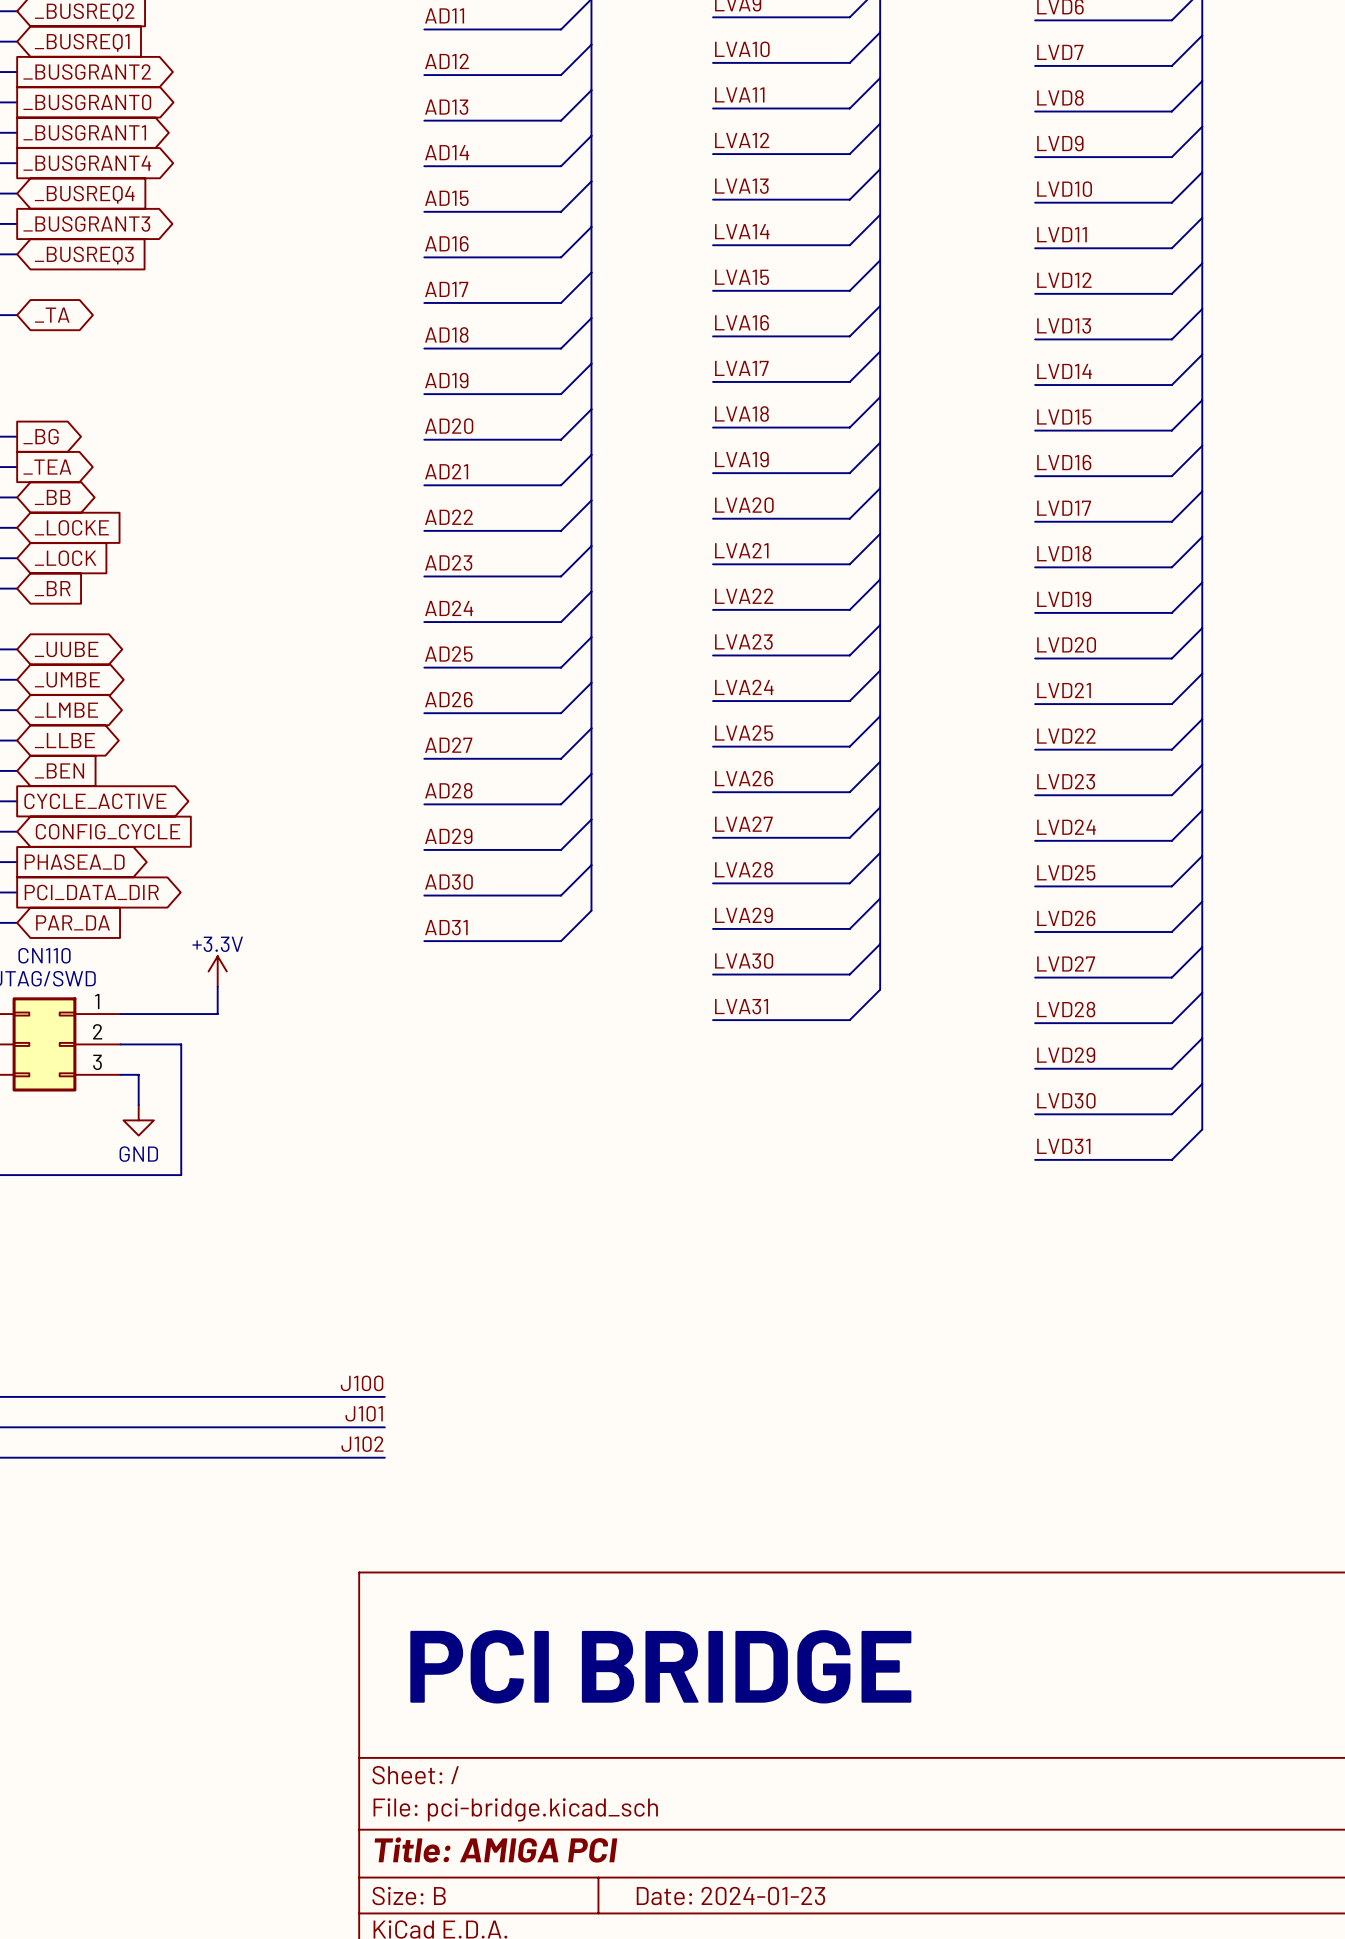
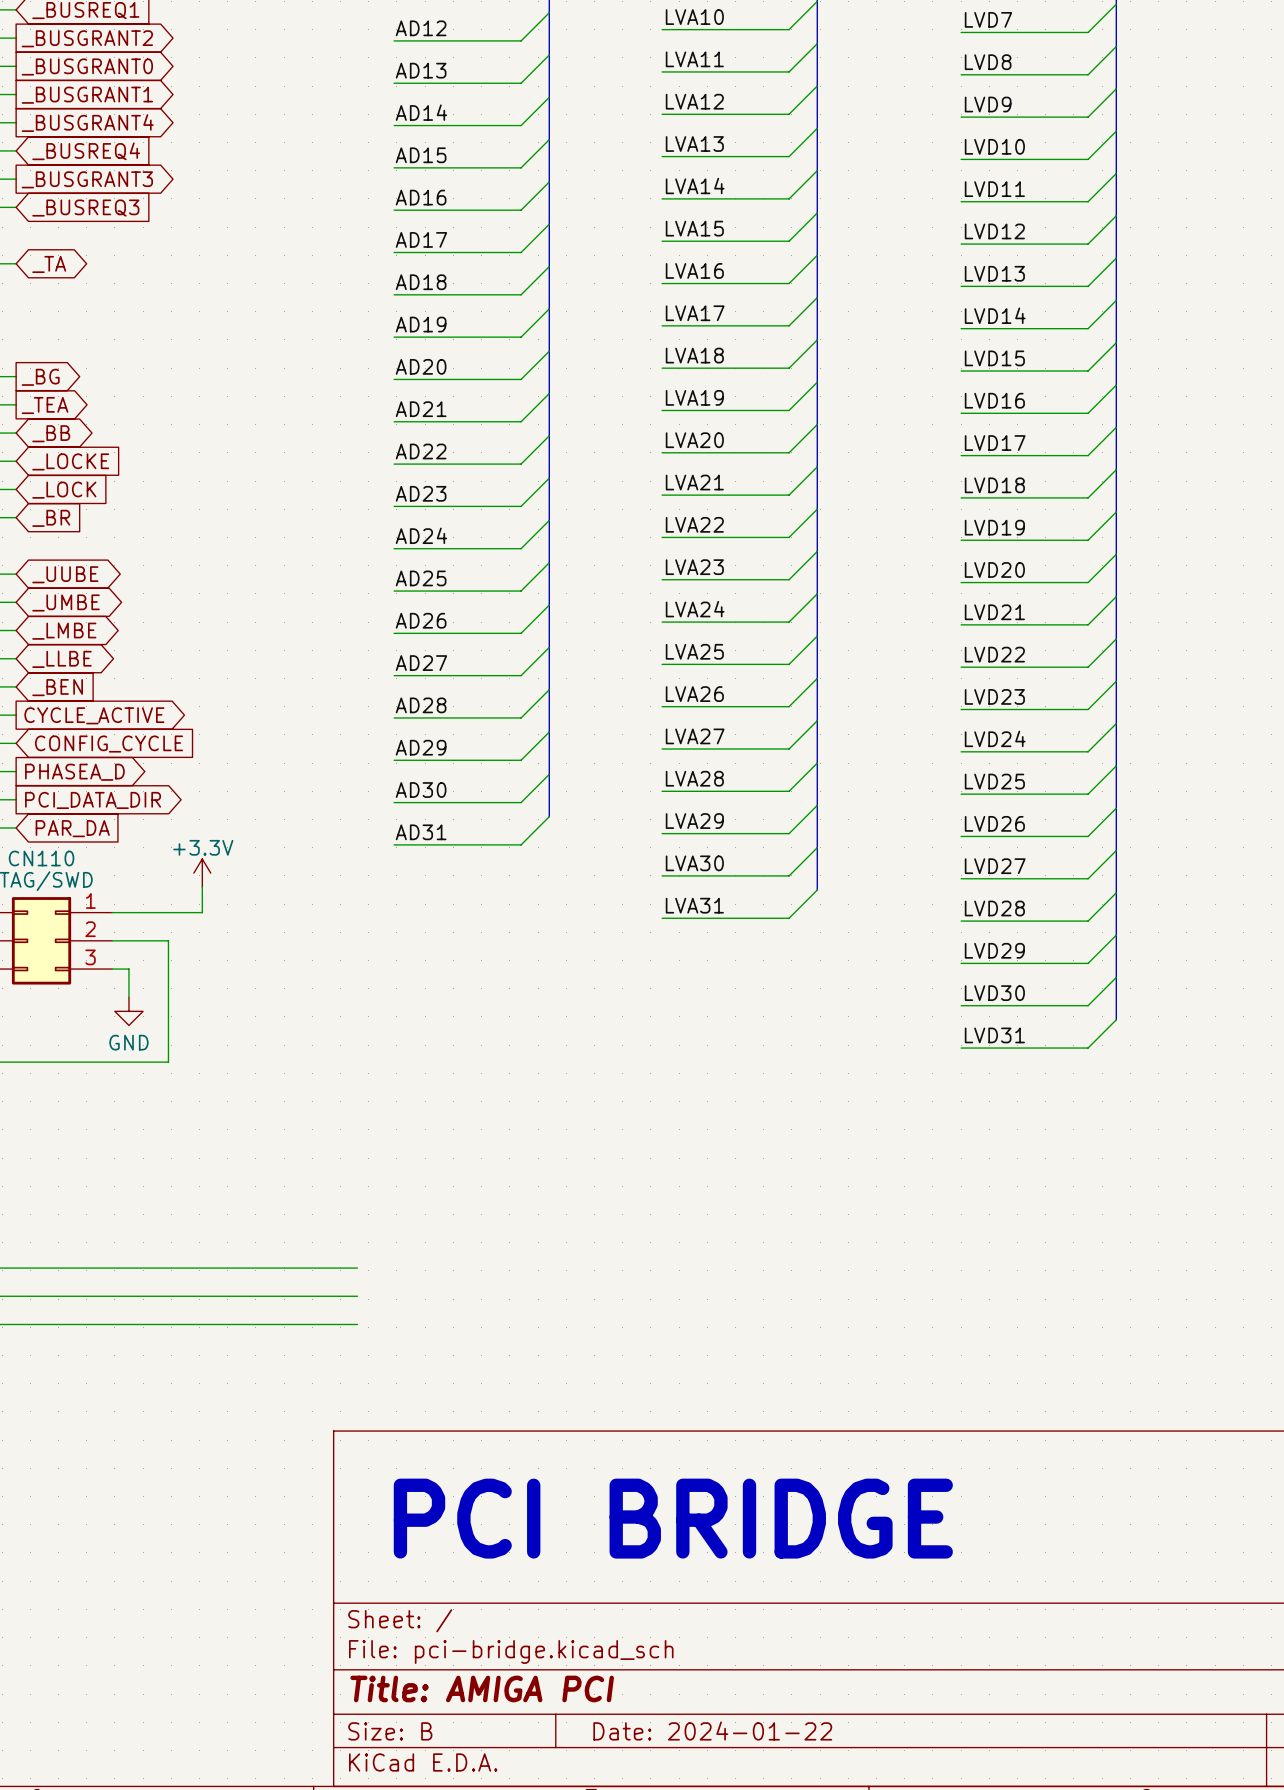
label: J100 (362, 1383) -> none
label: J101 (364, 1413) -> none
label: J102 (362, 1444) -> none
title block: Date: 2024-01-23 (730, 1896) -> Date: 2024-01-22 (712, 1730)

